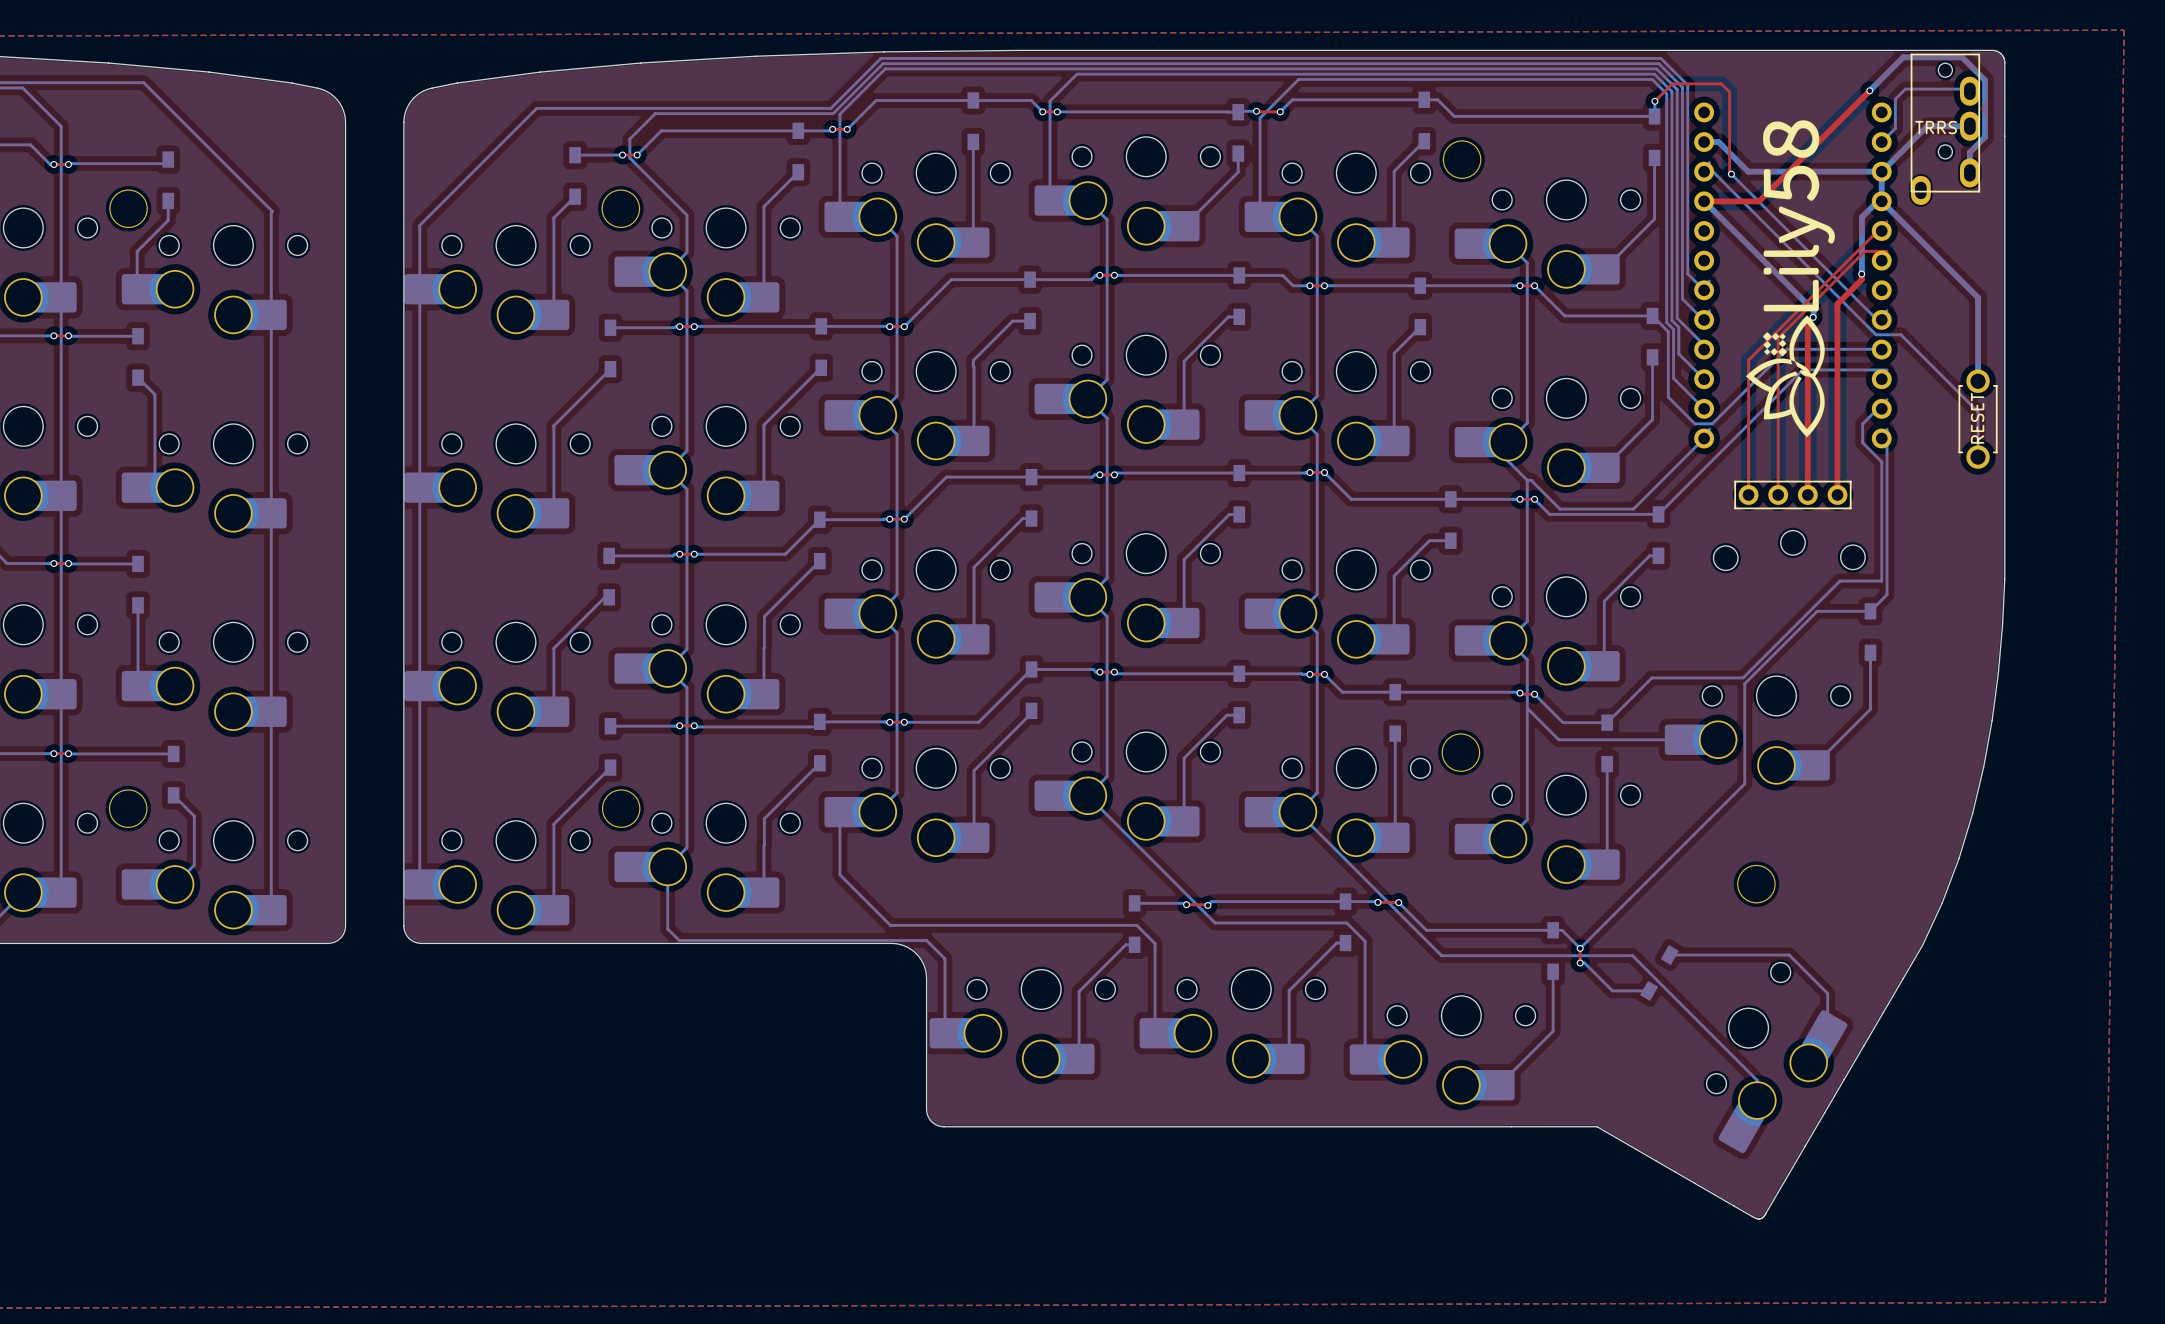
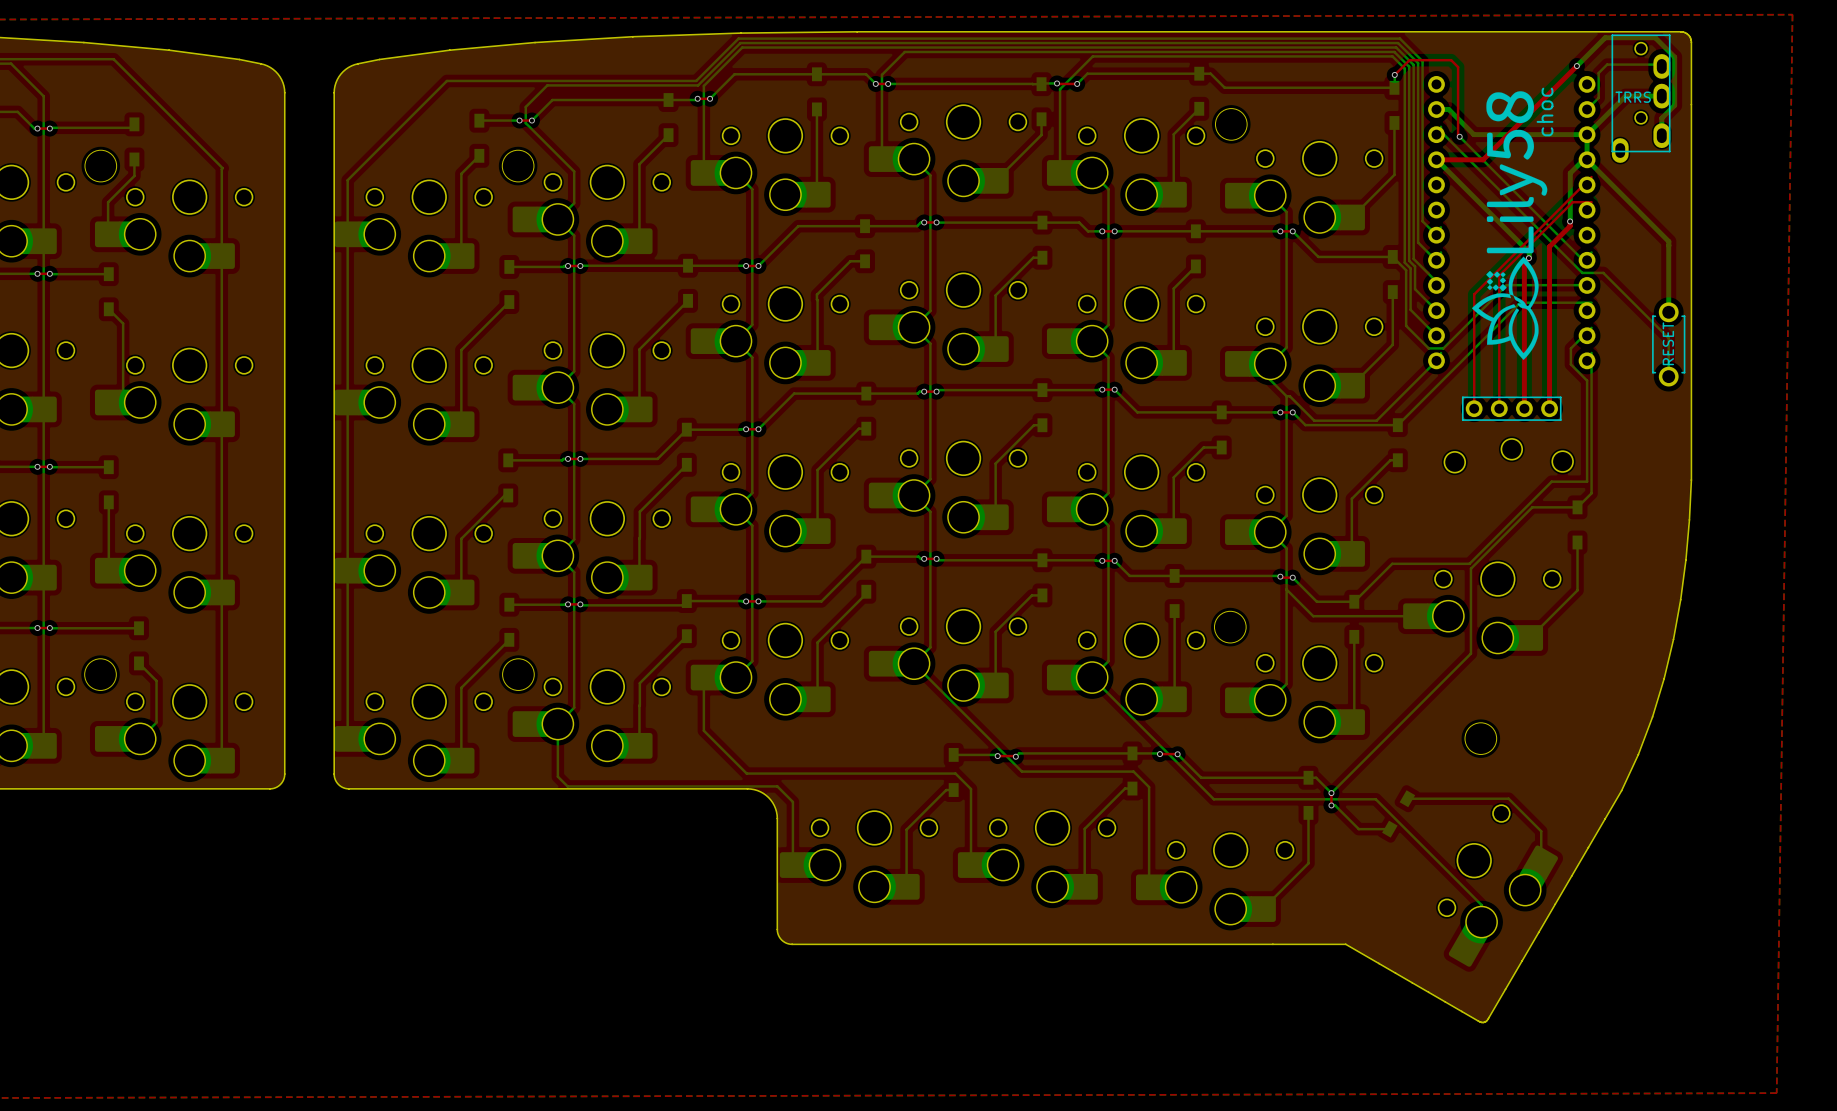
drawing shape: [1745, 120, 1835, 438] -> [1471, 87, 1554, 360]

